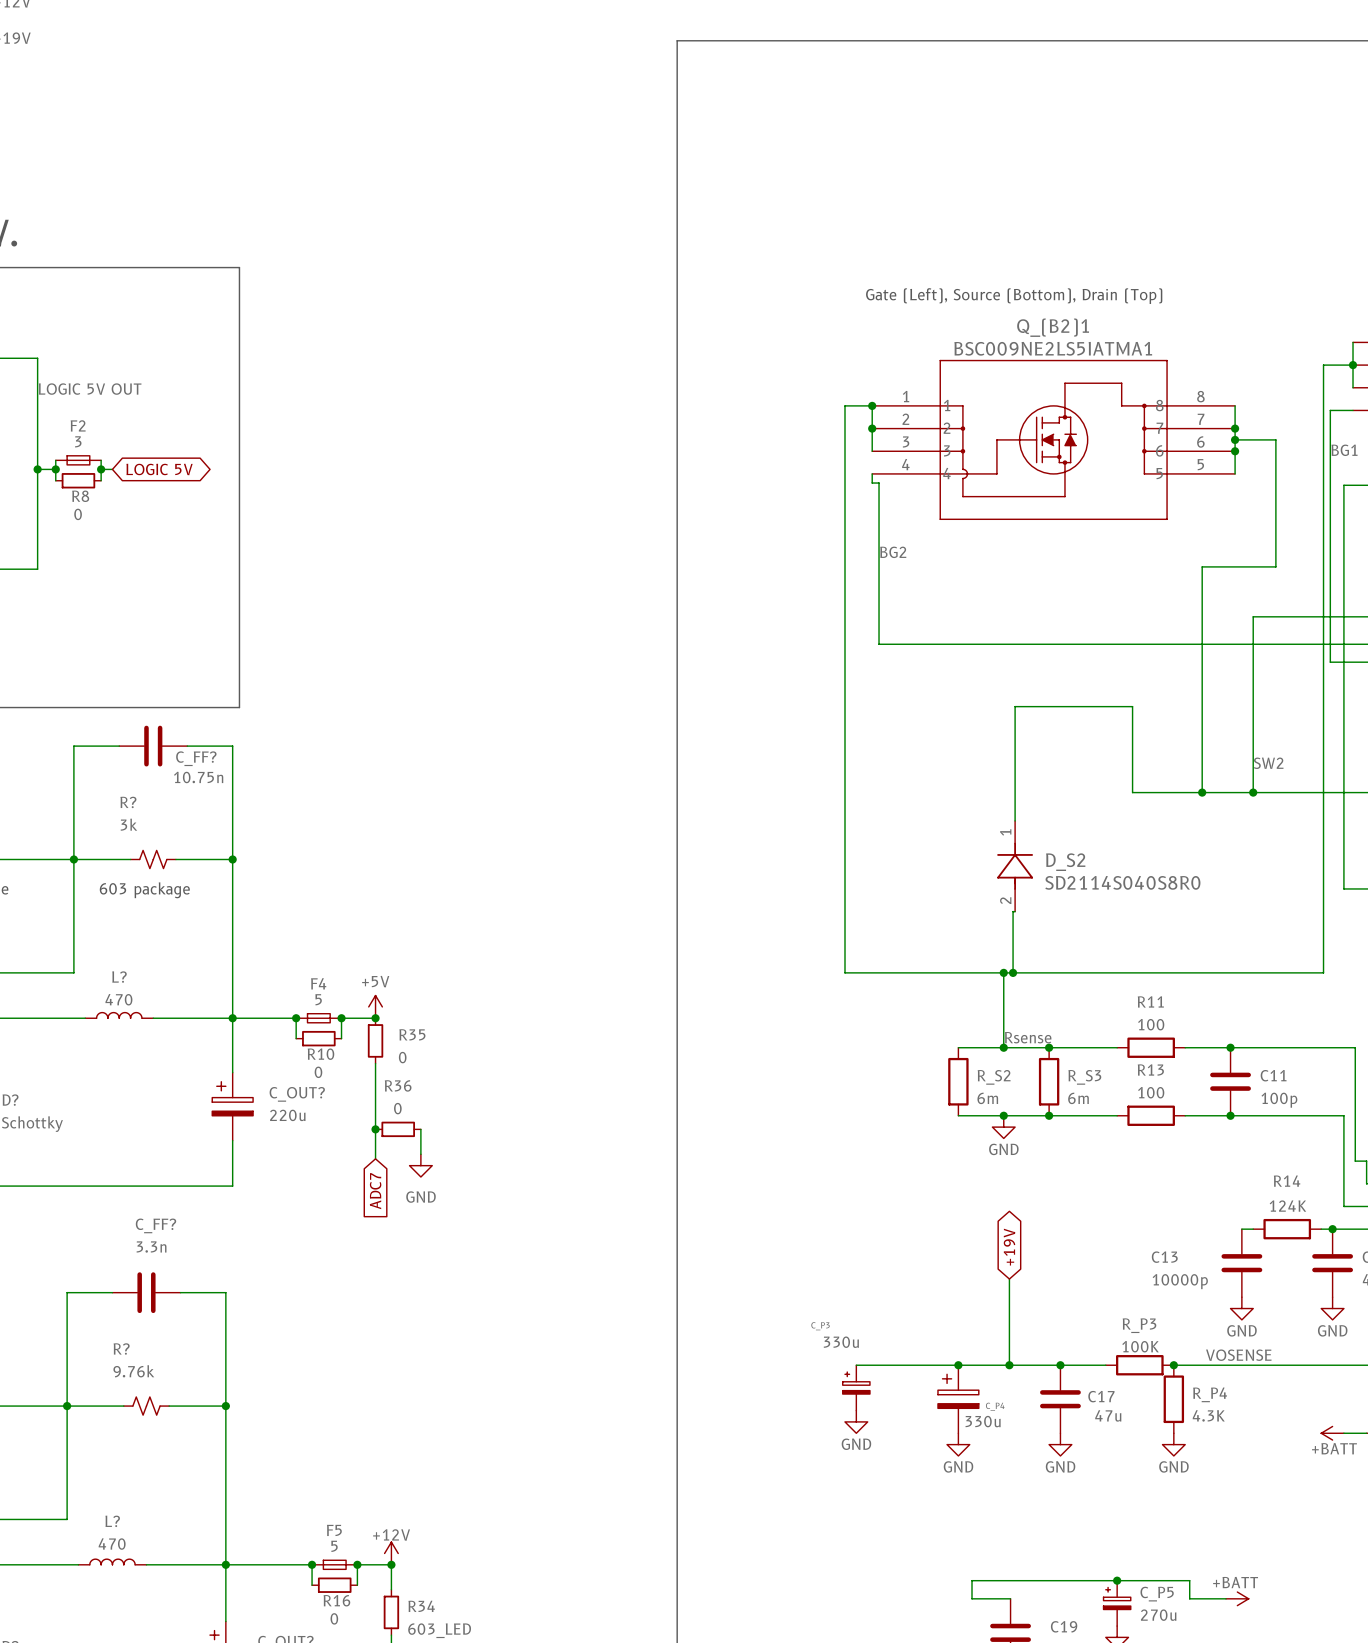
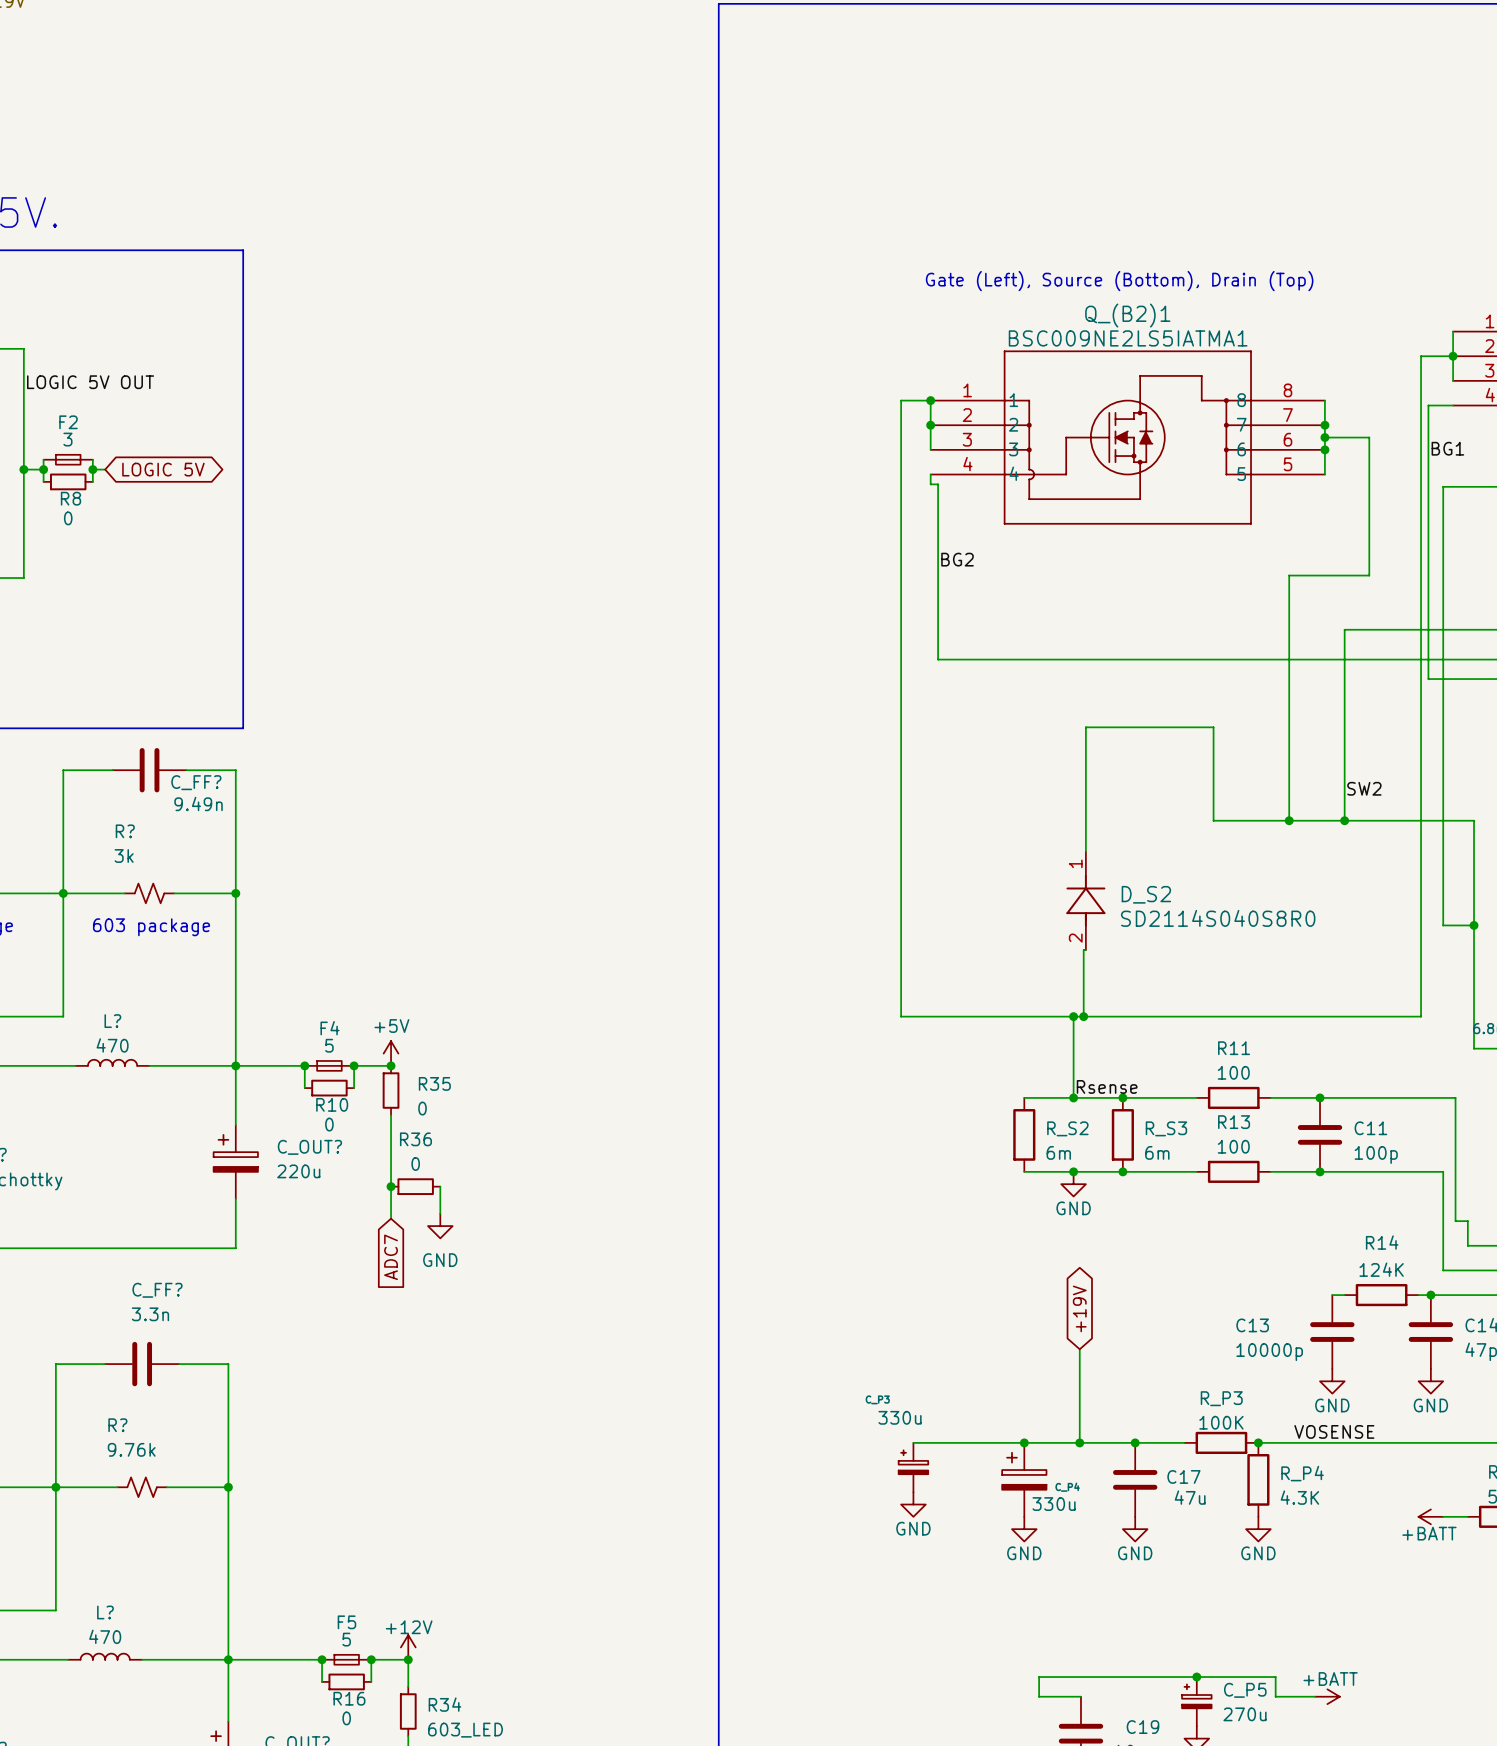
C_FF? value: 10.75n (198, 777) -> 9.49n (198, 803)

